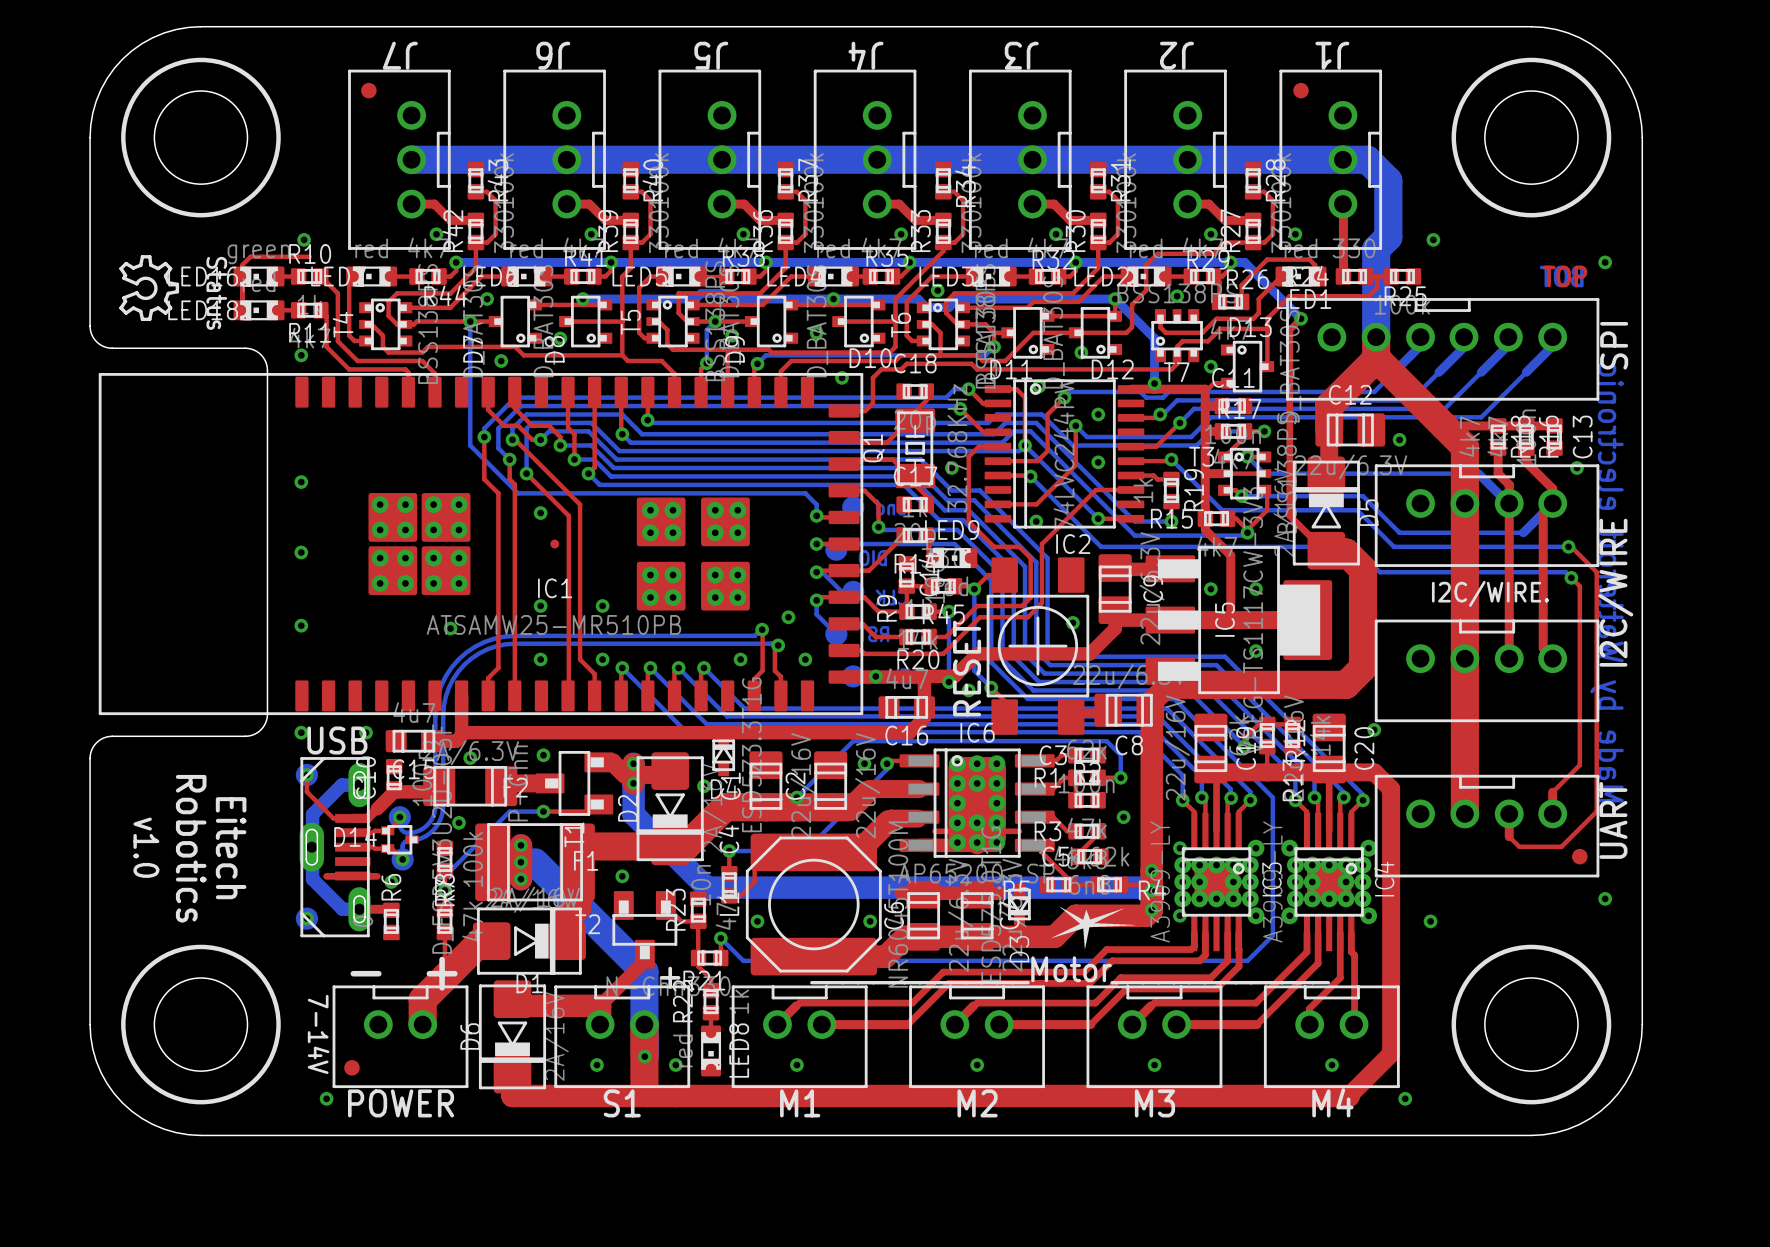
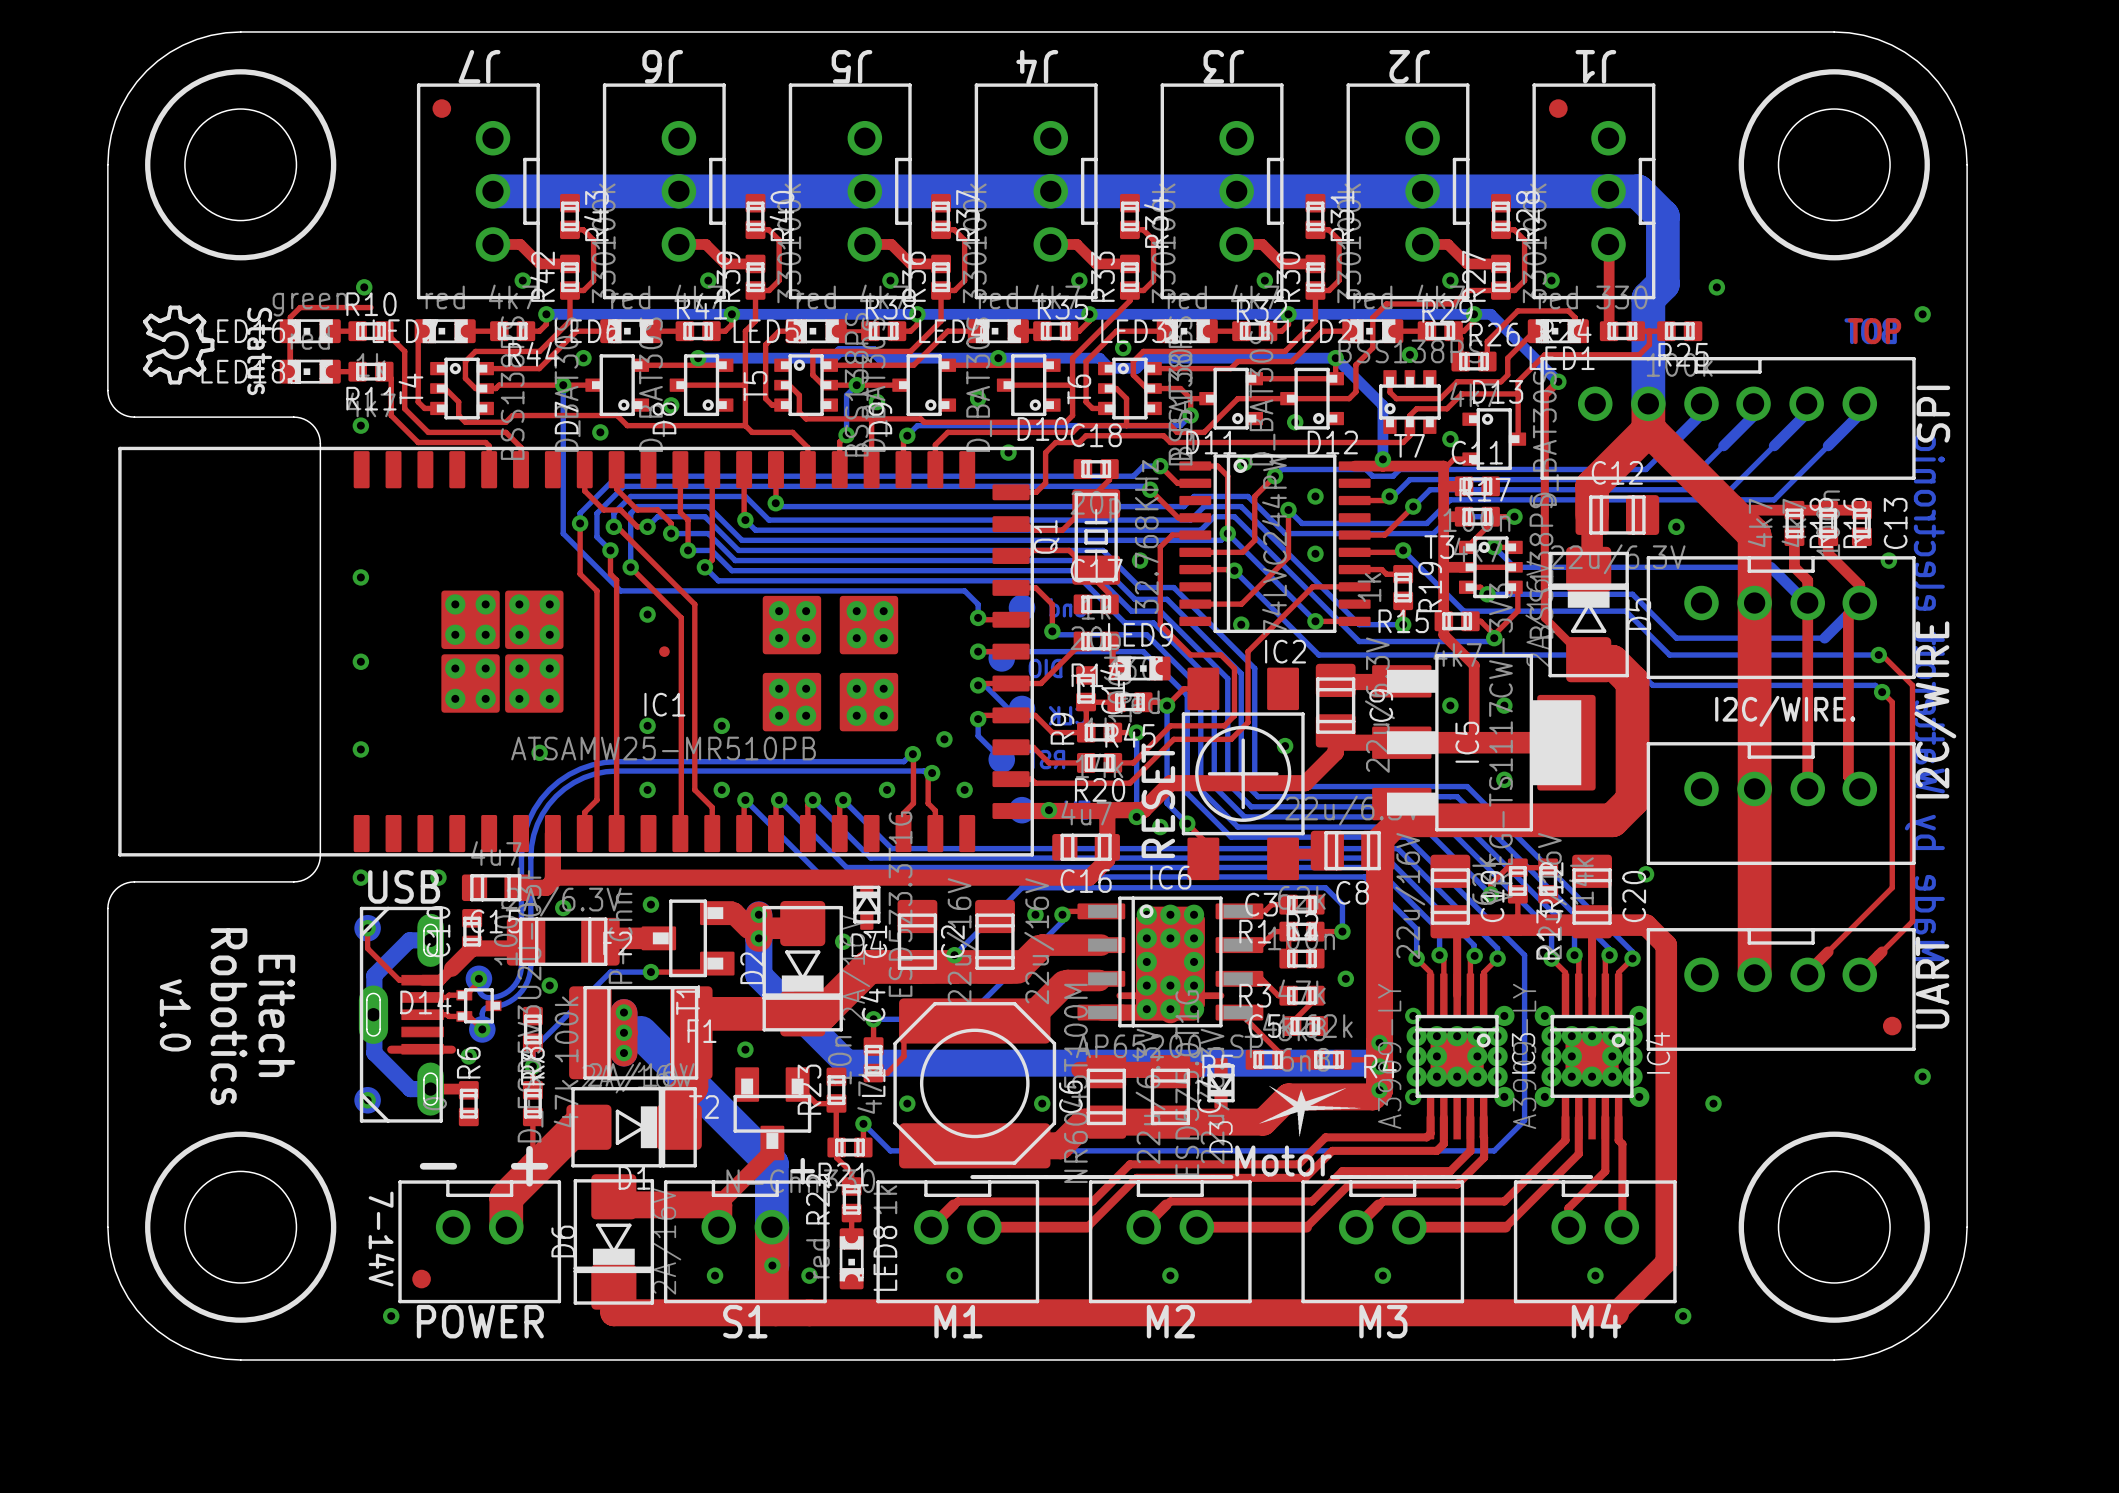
top track: (1579, 741) (1579, 765) (1552, 792) (1552, 813) -> (1912, 921) (1859, 974)
top track: (1596, 769) (1596, 811) (1561, 846) (1519, 846) (1509, 836) (1509, 813) -> (1892, 887) (1807, 972) (1807, 974)

